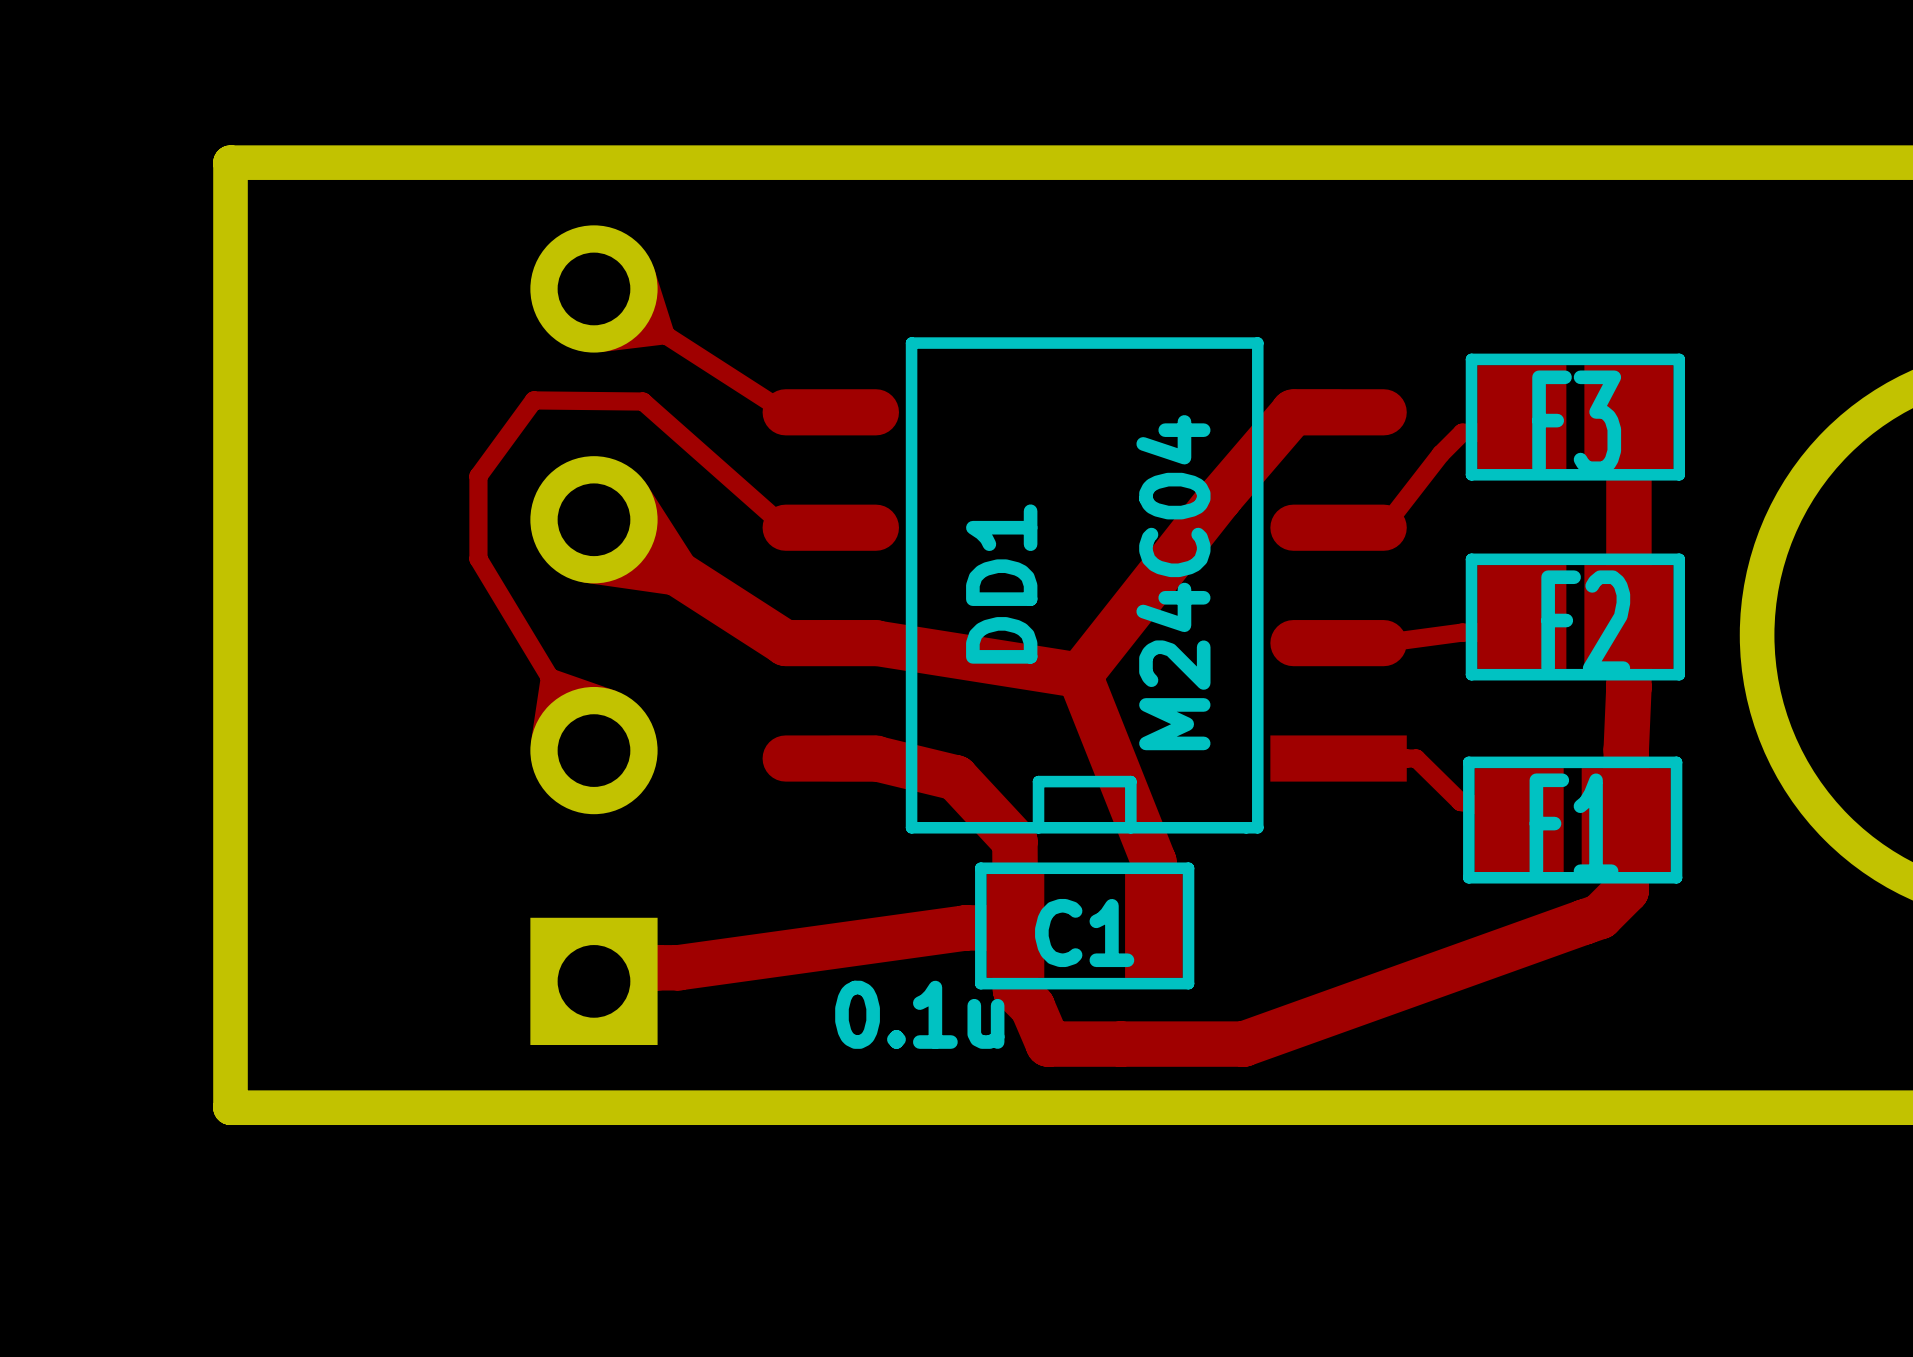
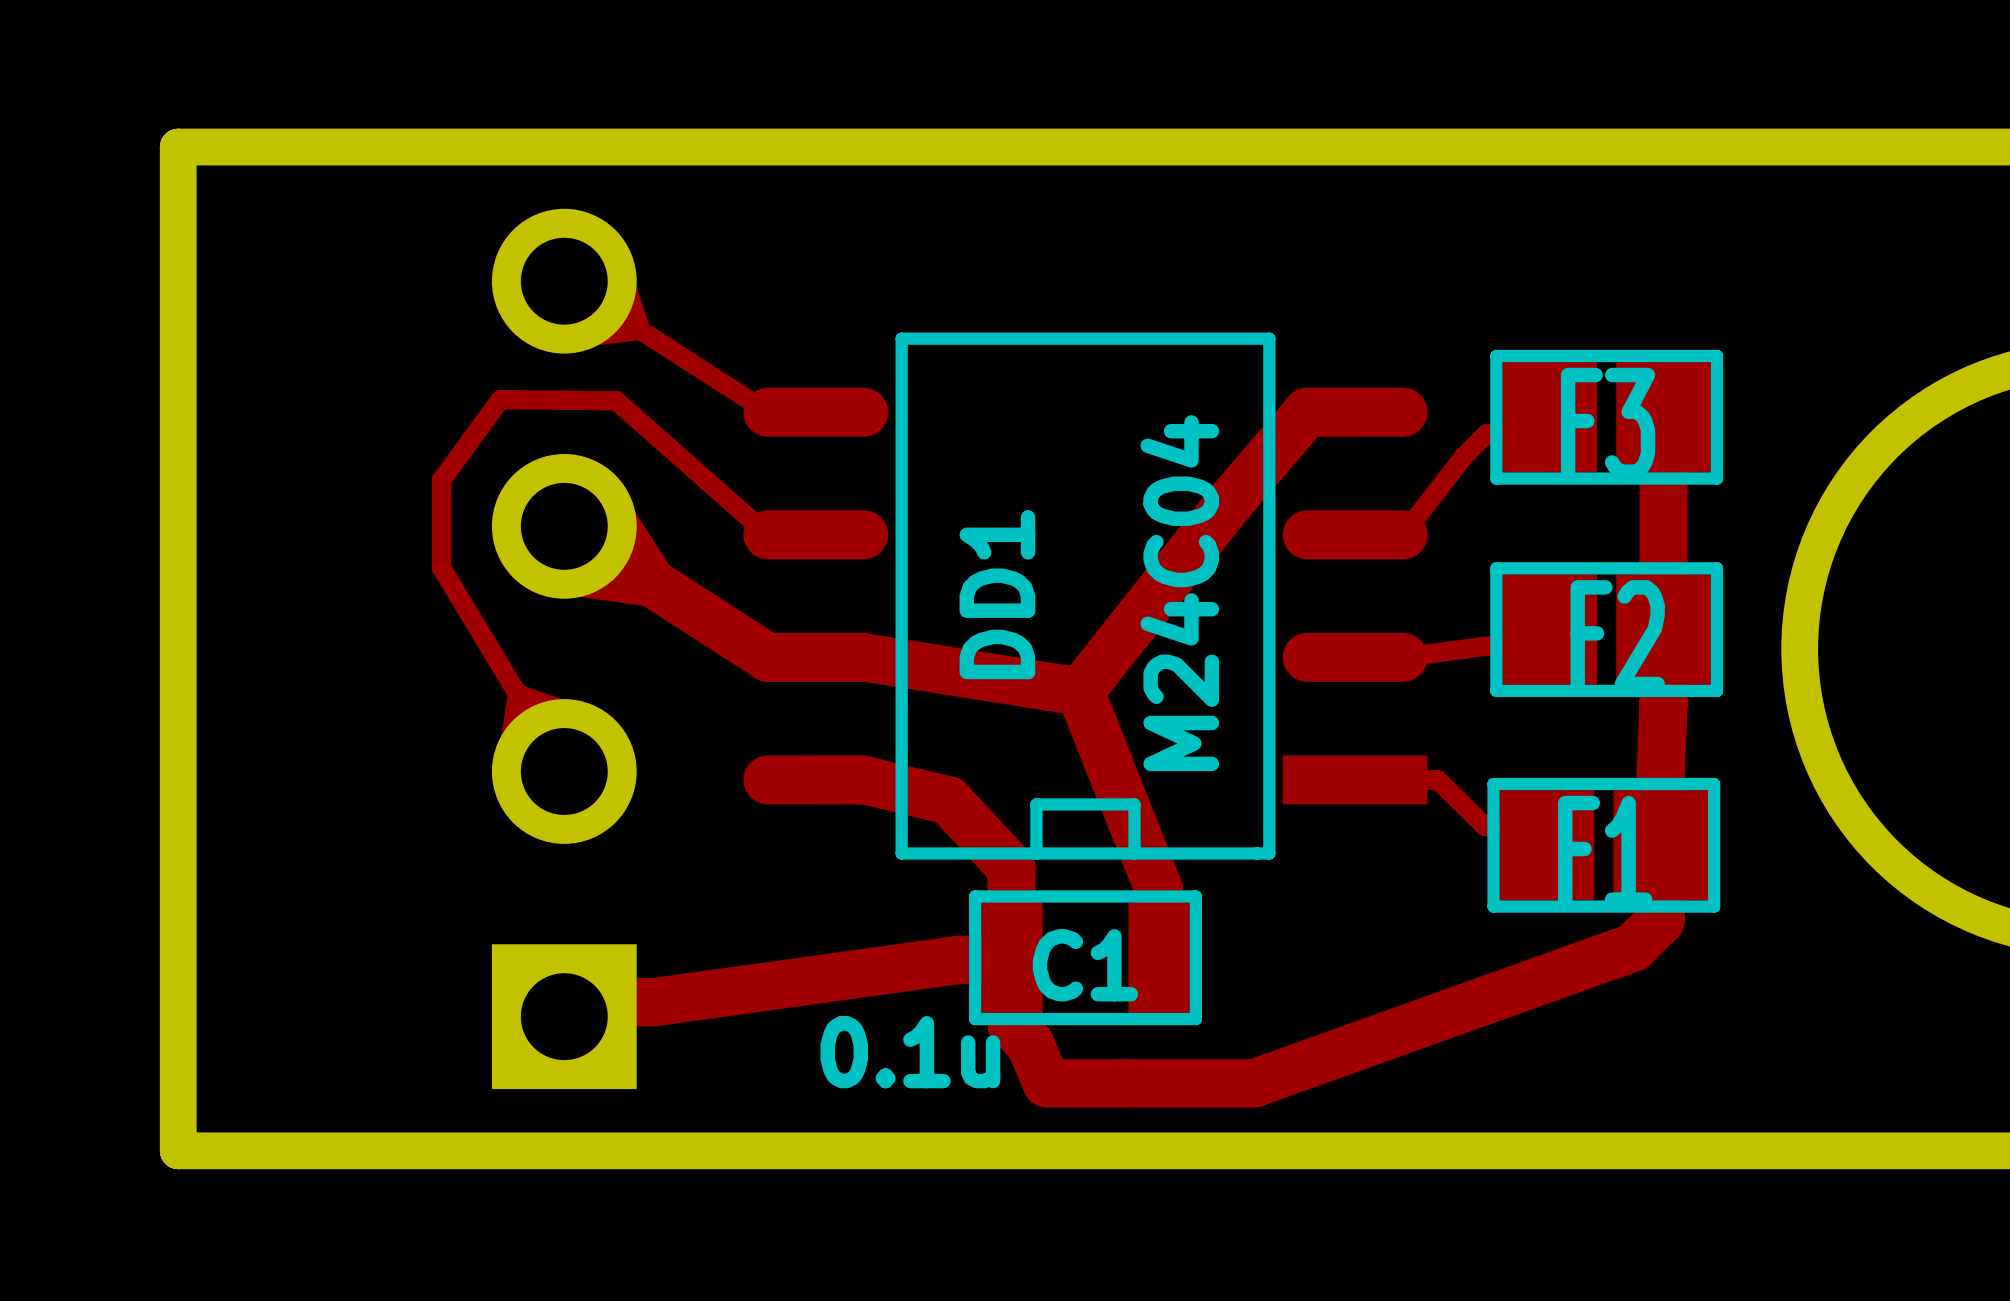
part footprint: [530, 225, 658, 1045] -> [491, 208, 637, 1090]

